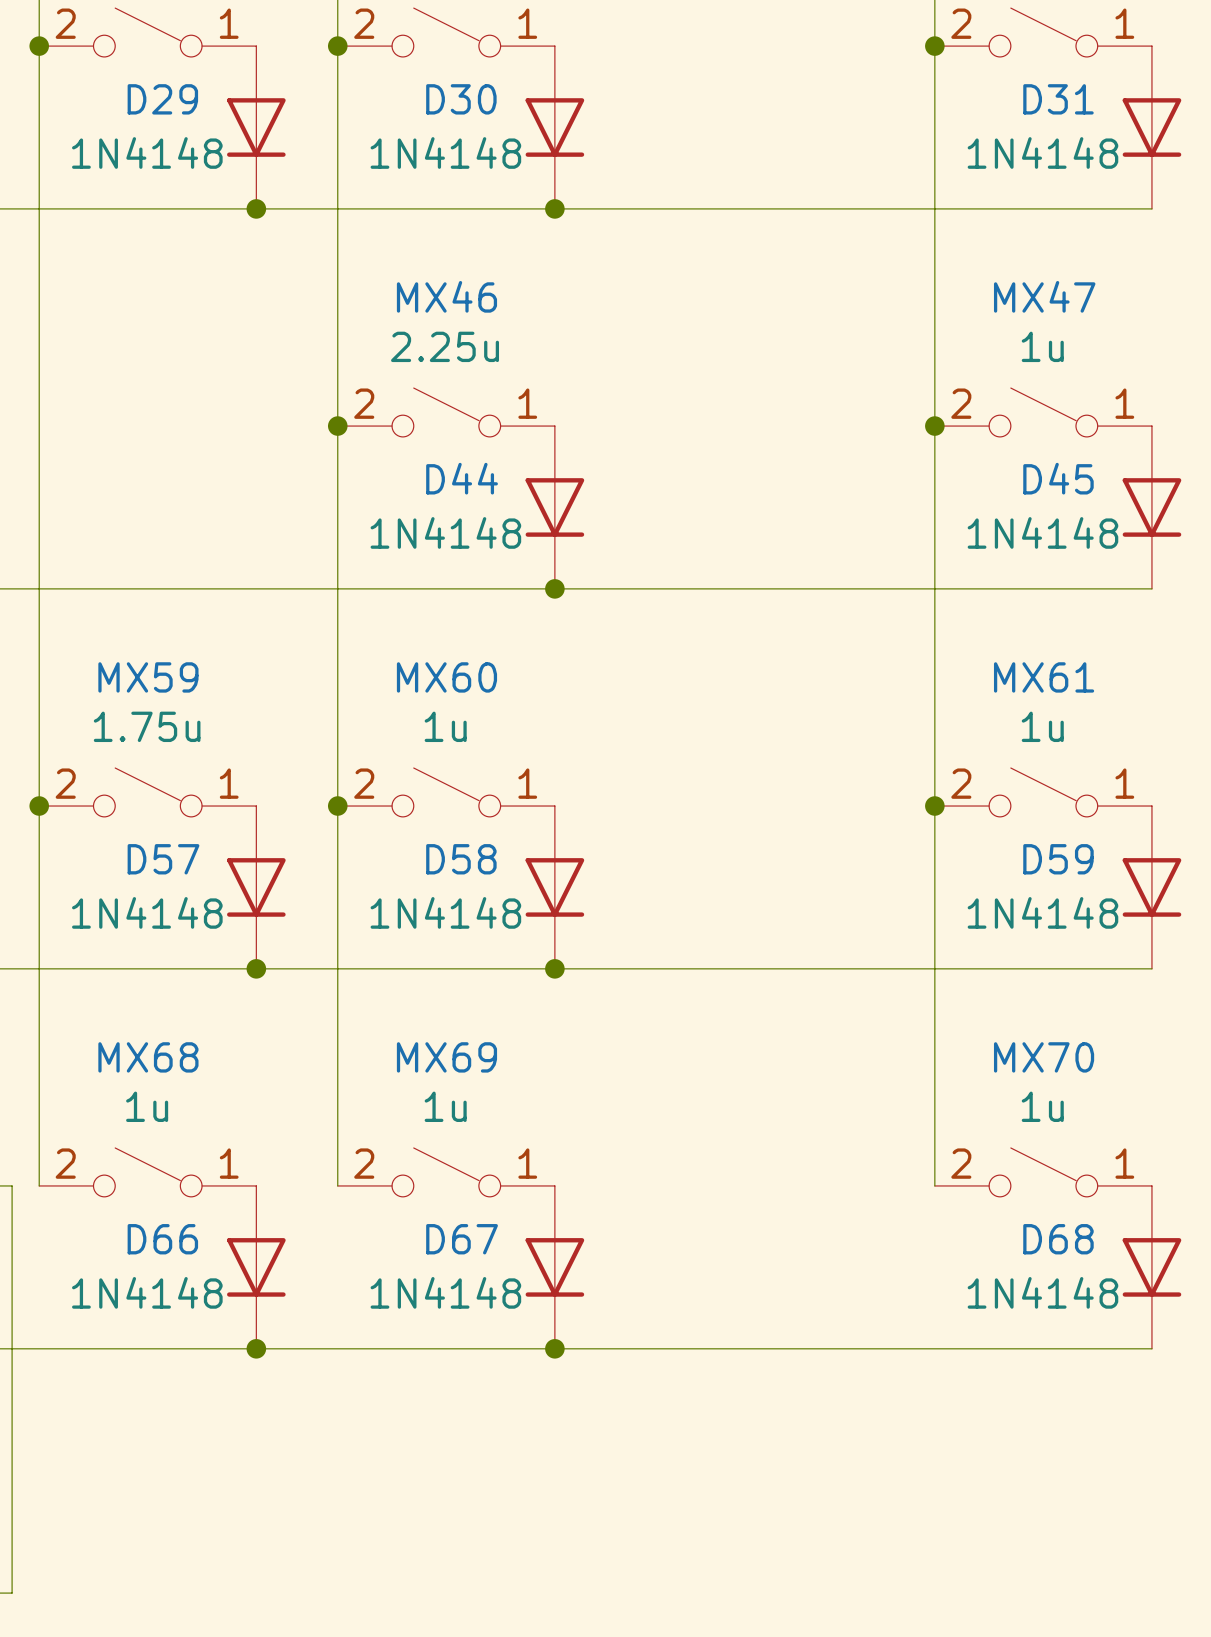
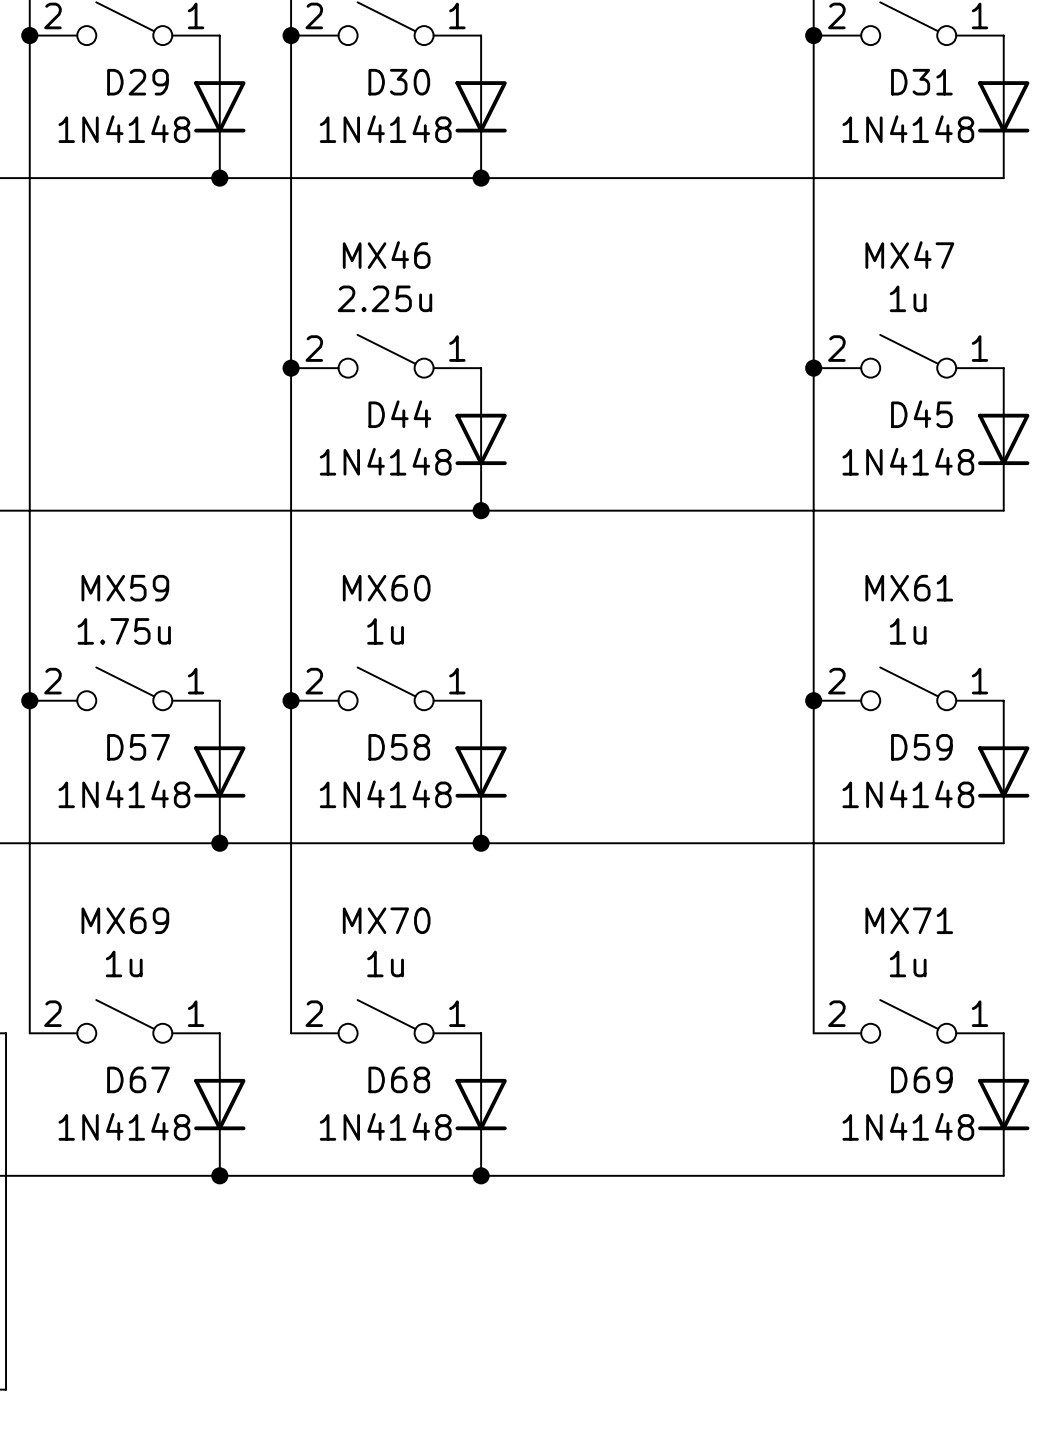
MX68 name: MX68 (148, 1057) -> MX69 (125, 920)
MX69 name: MX69 (446, 1057) -> MX70 (386, 920)
MX70 name: MX70 (1044, 1057) -> MX71 (909, 920)
D66 name: D66 (162, 1239) -> D67 (138, 1079)
D67 name: D67 (462, 1239) -> D68 (399, 1079)
D68 name: D68 (1058, 1239) -> D69 (921, 1079)

